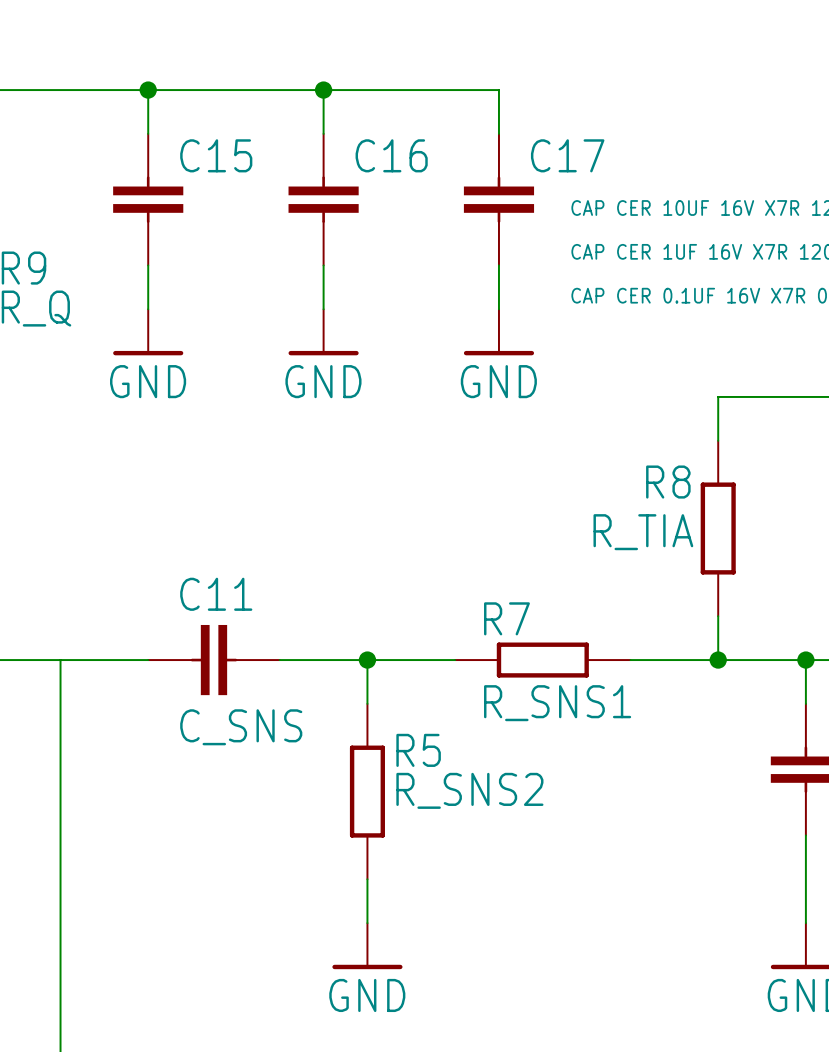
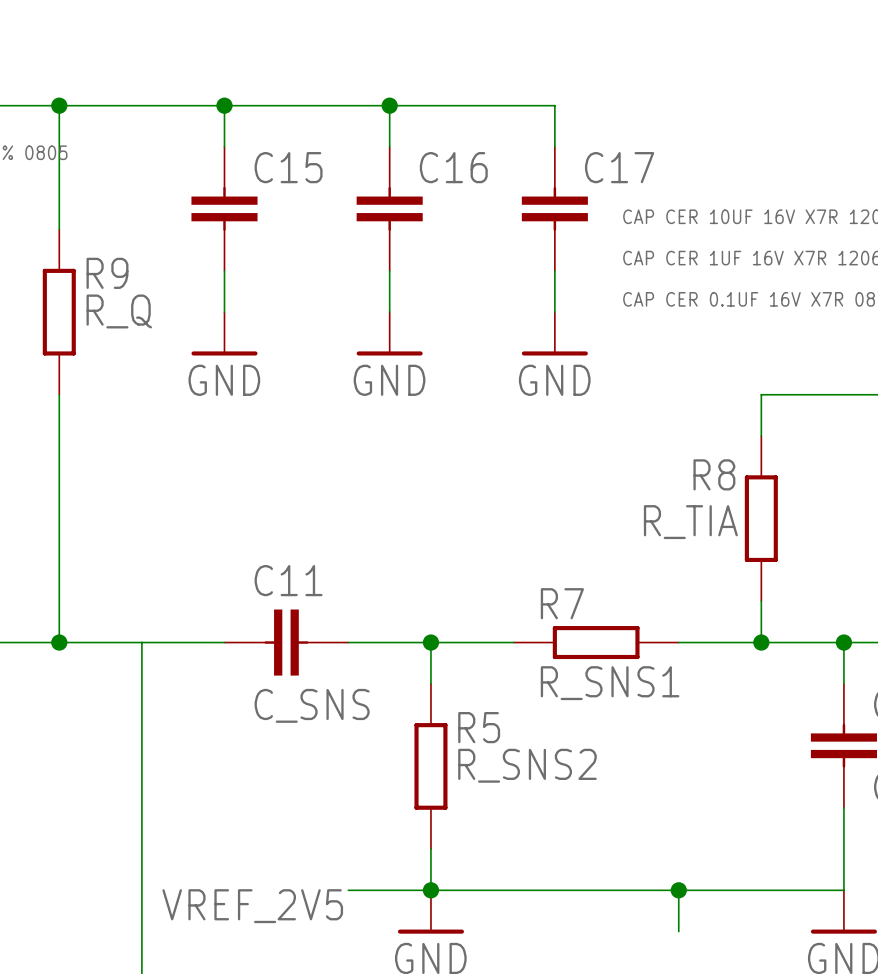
wire: none -> (348, 890) (843, 890)
junction: none -> (430, 890)
wire: none -> (678, 890) (678, 931)
junction: none -> (678, 890)
label: none -> VREF_2V5 (252, 906)

